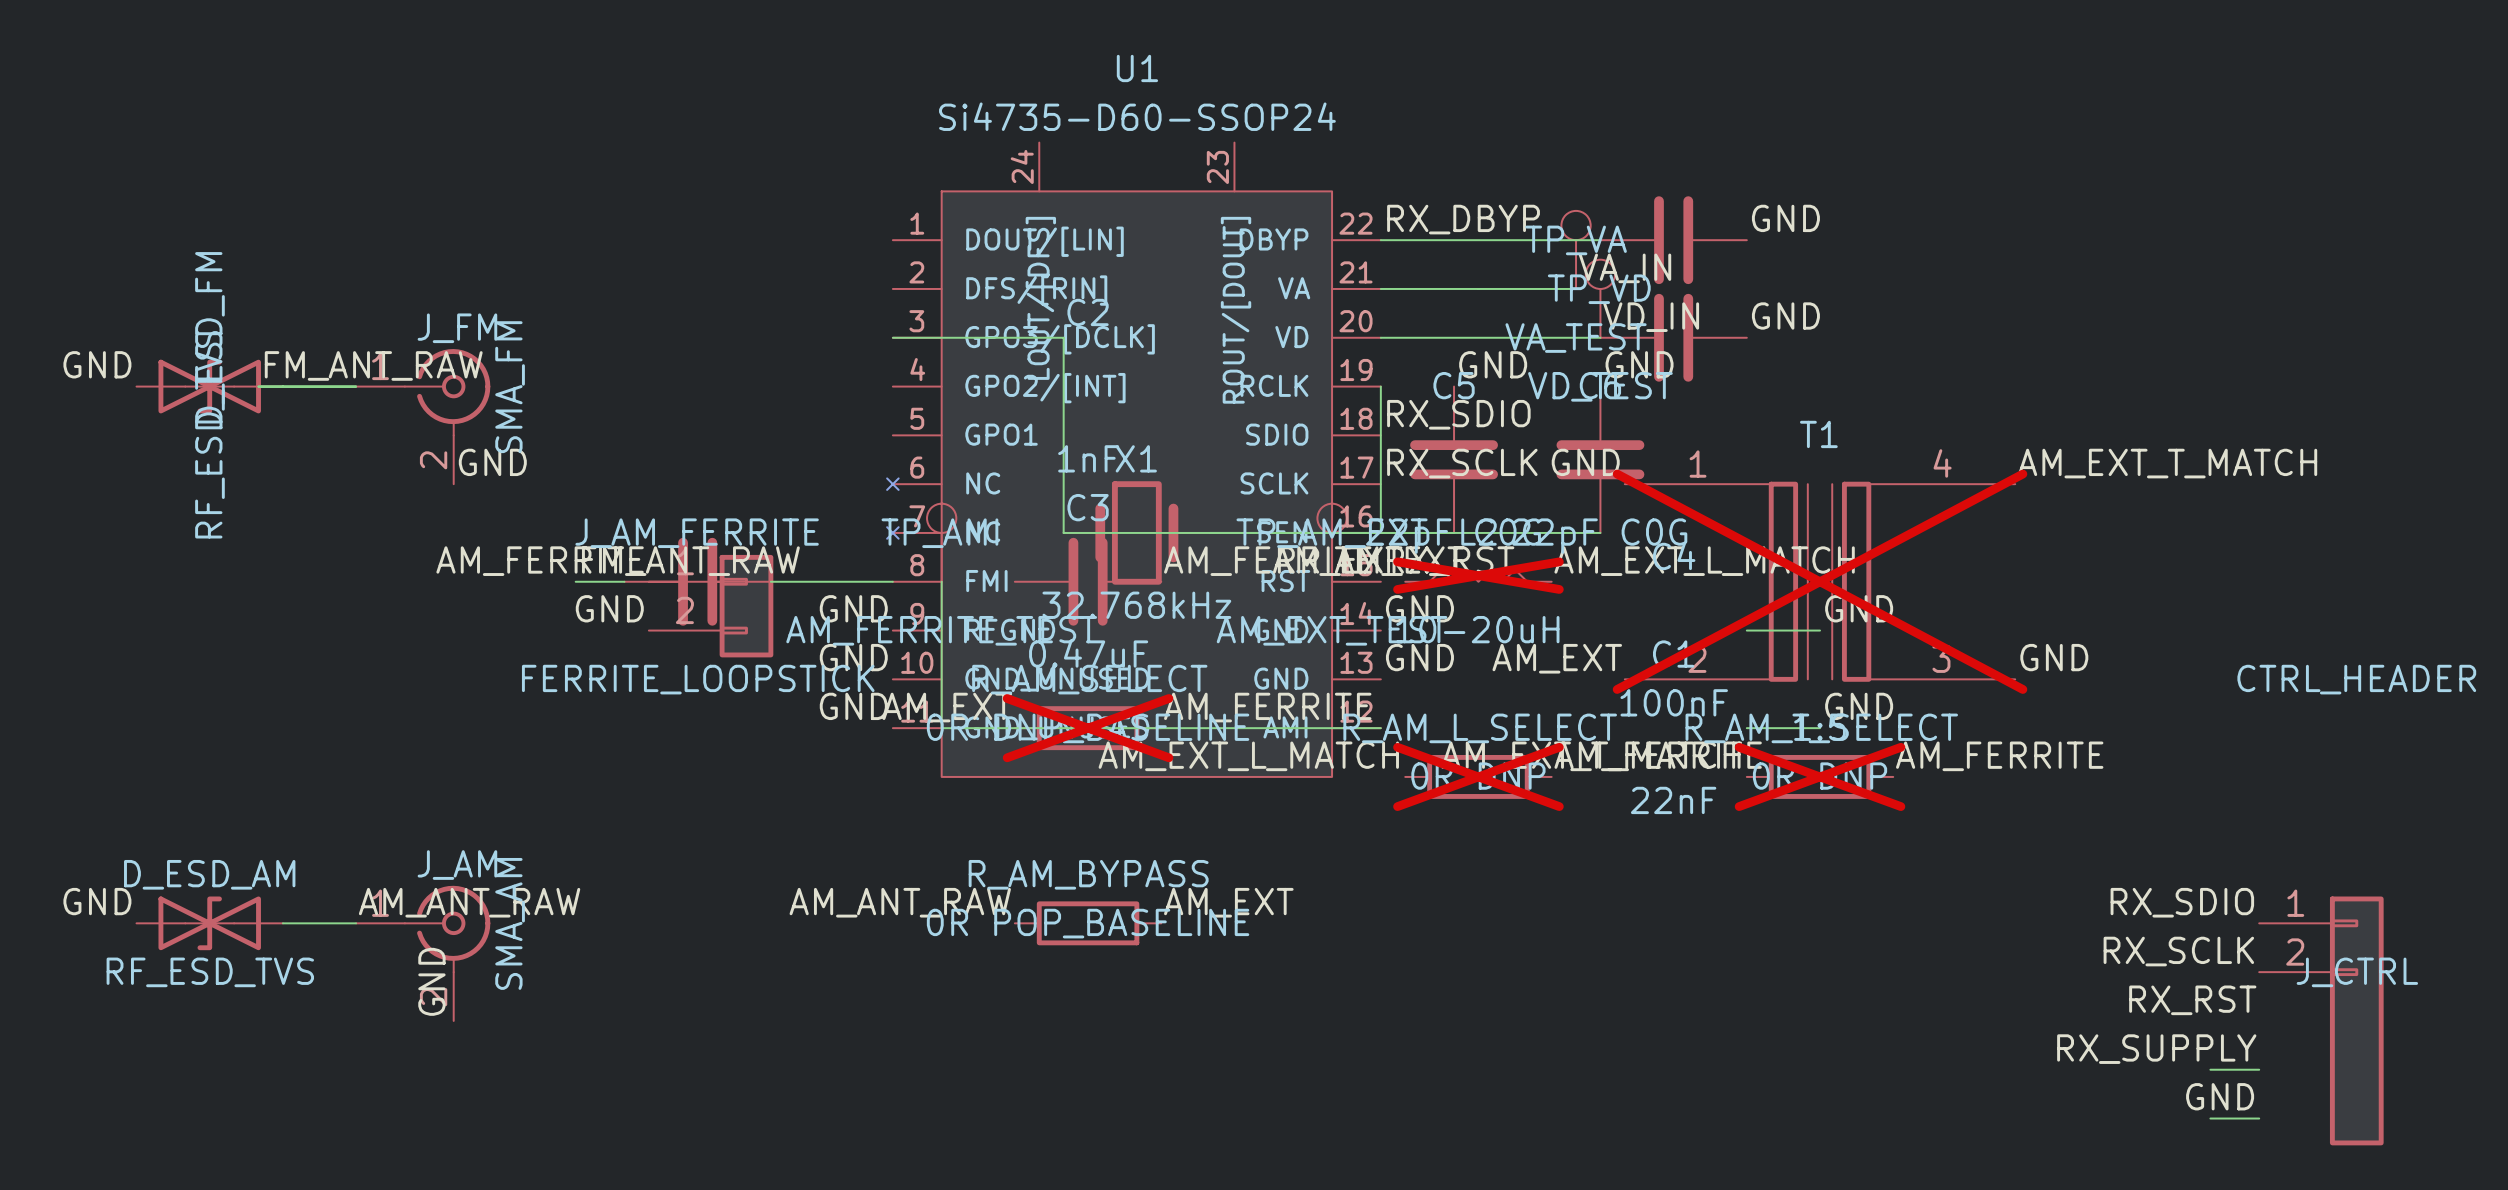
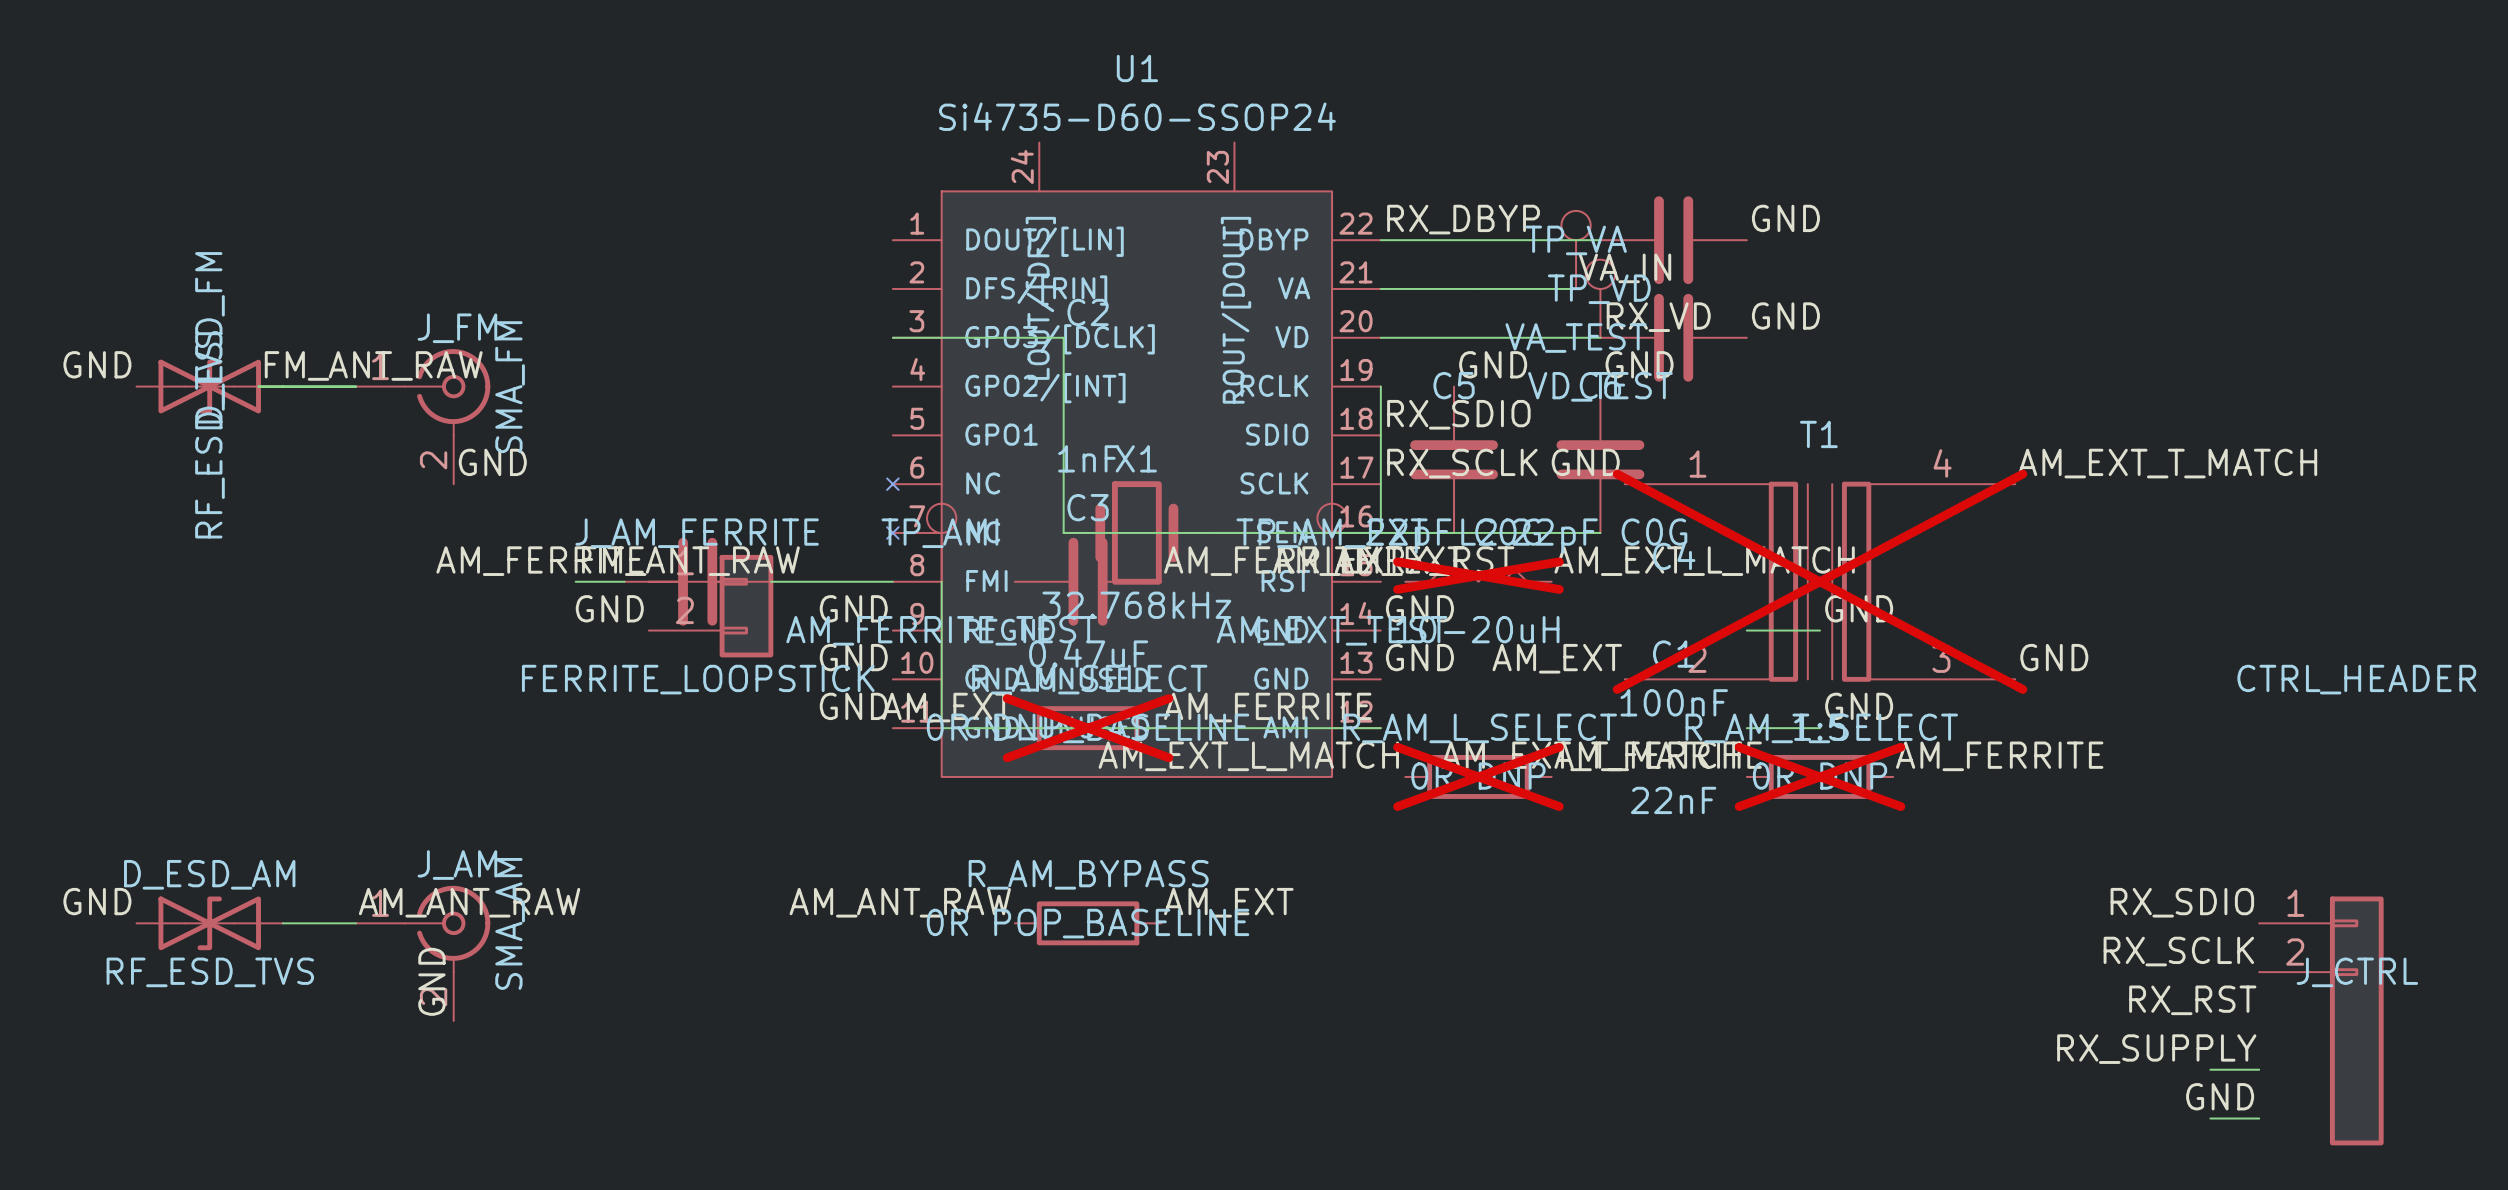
label: VD_IN (1651, 317) -> RX_VD (1658, 317)

